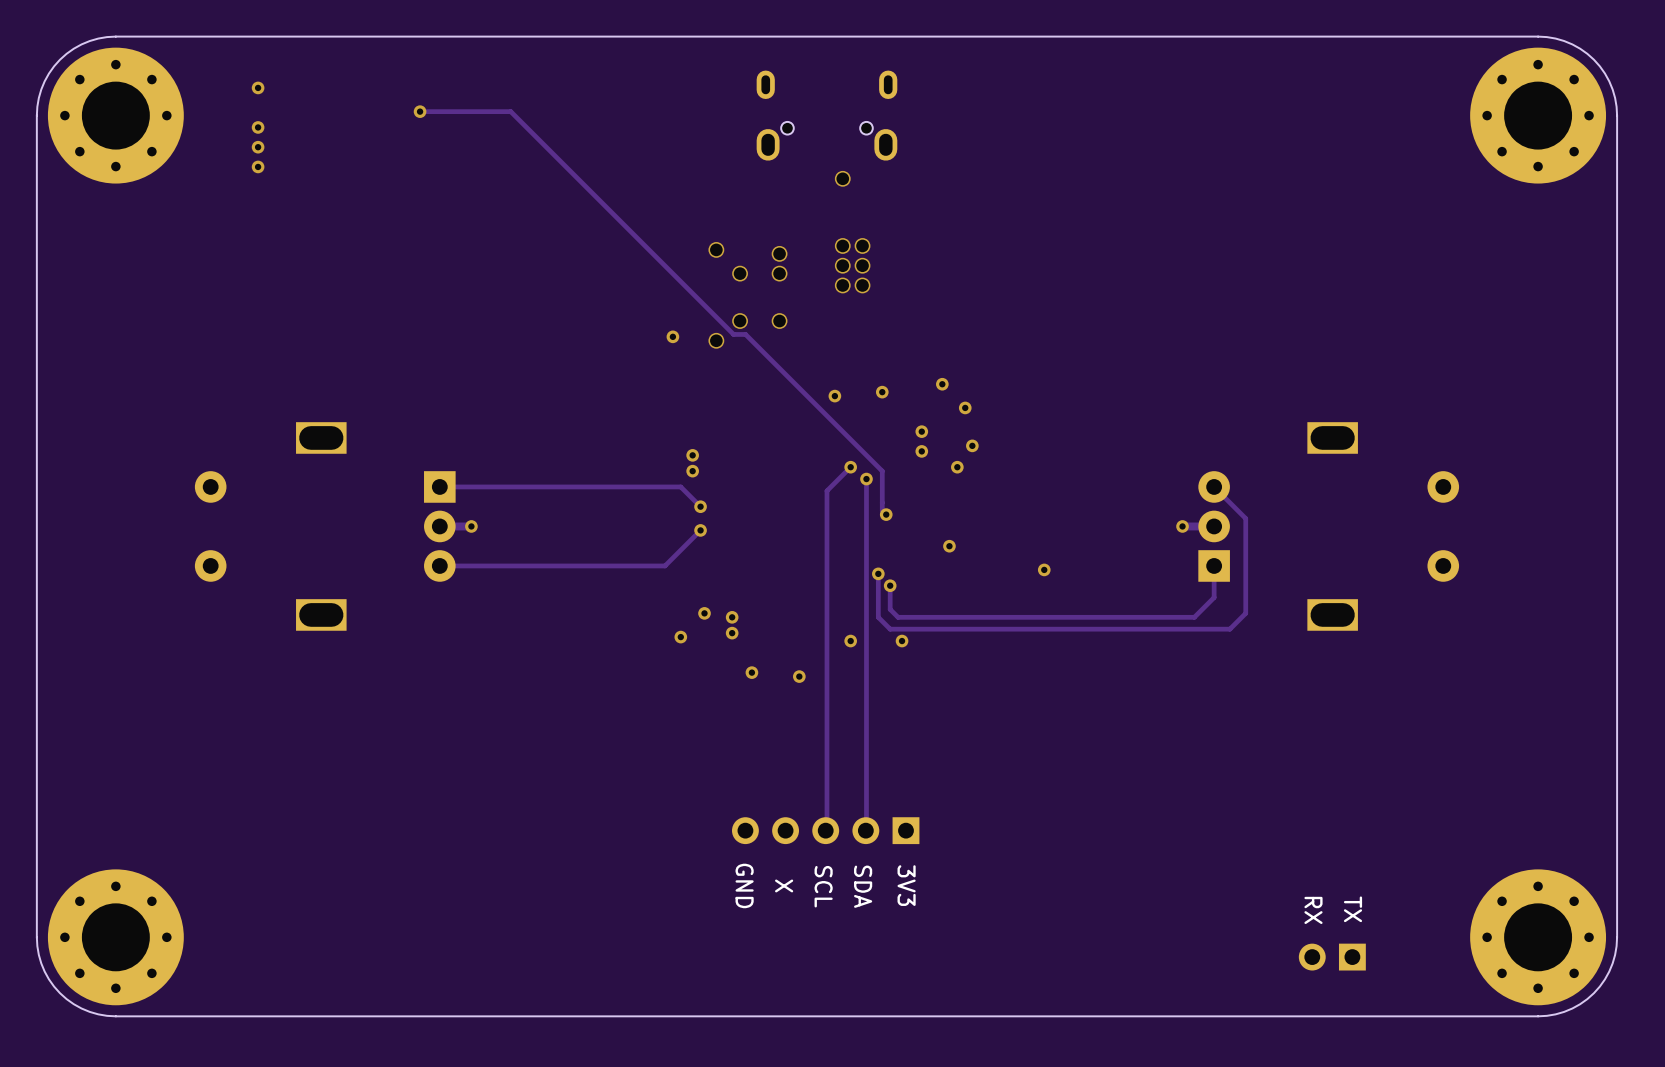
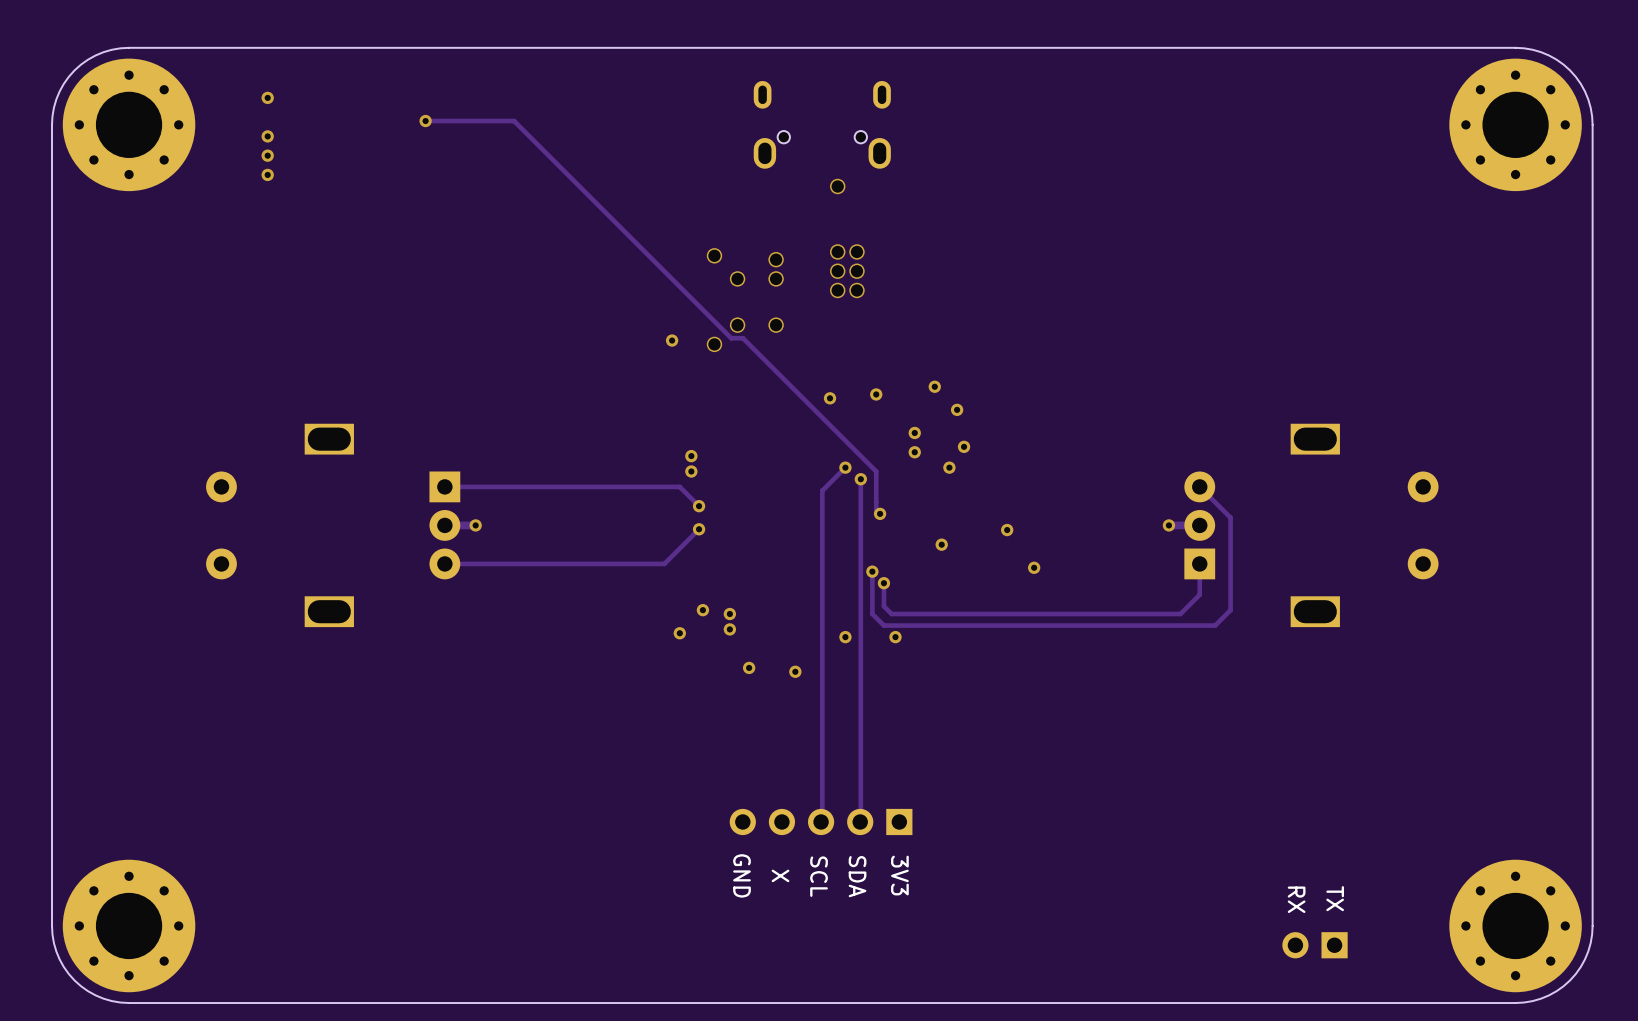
via: none -> (1007, 530)

